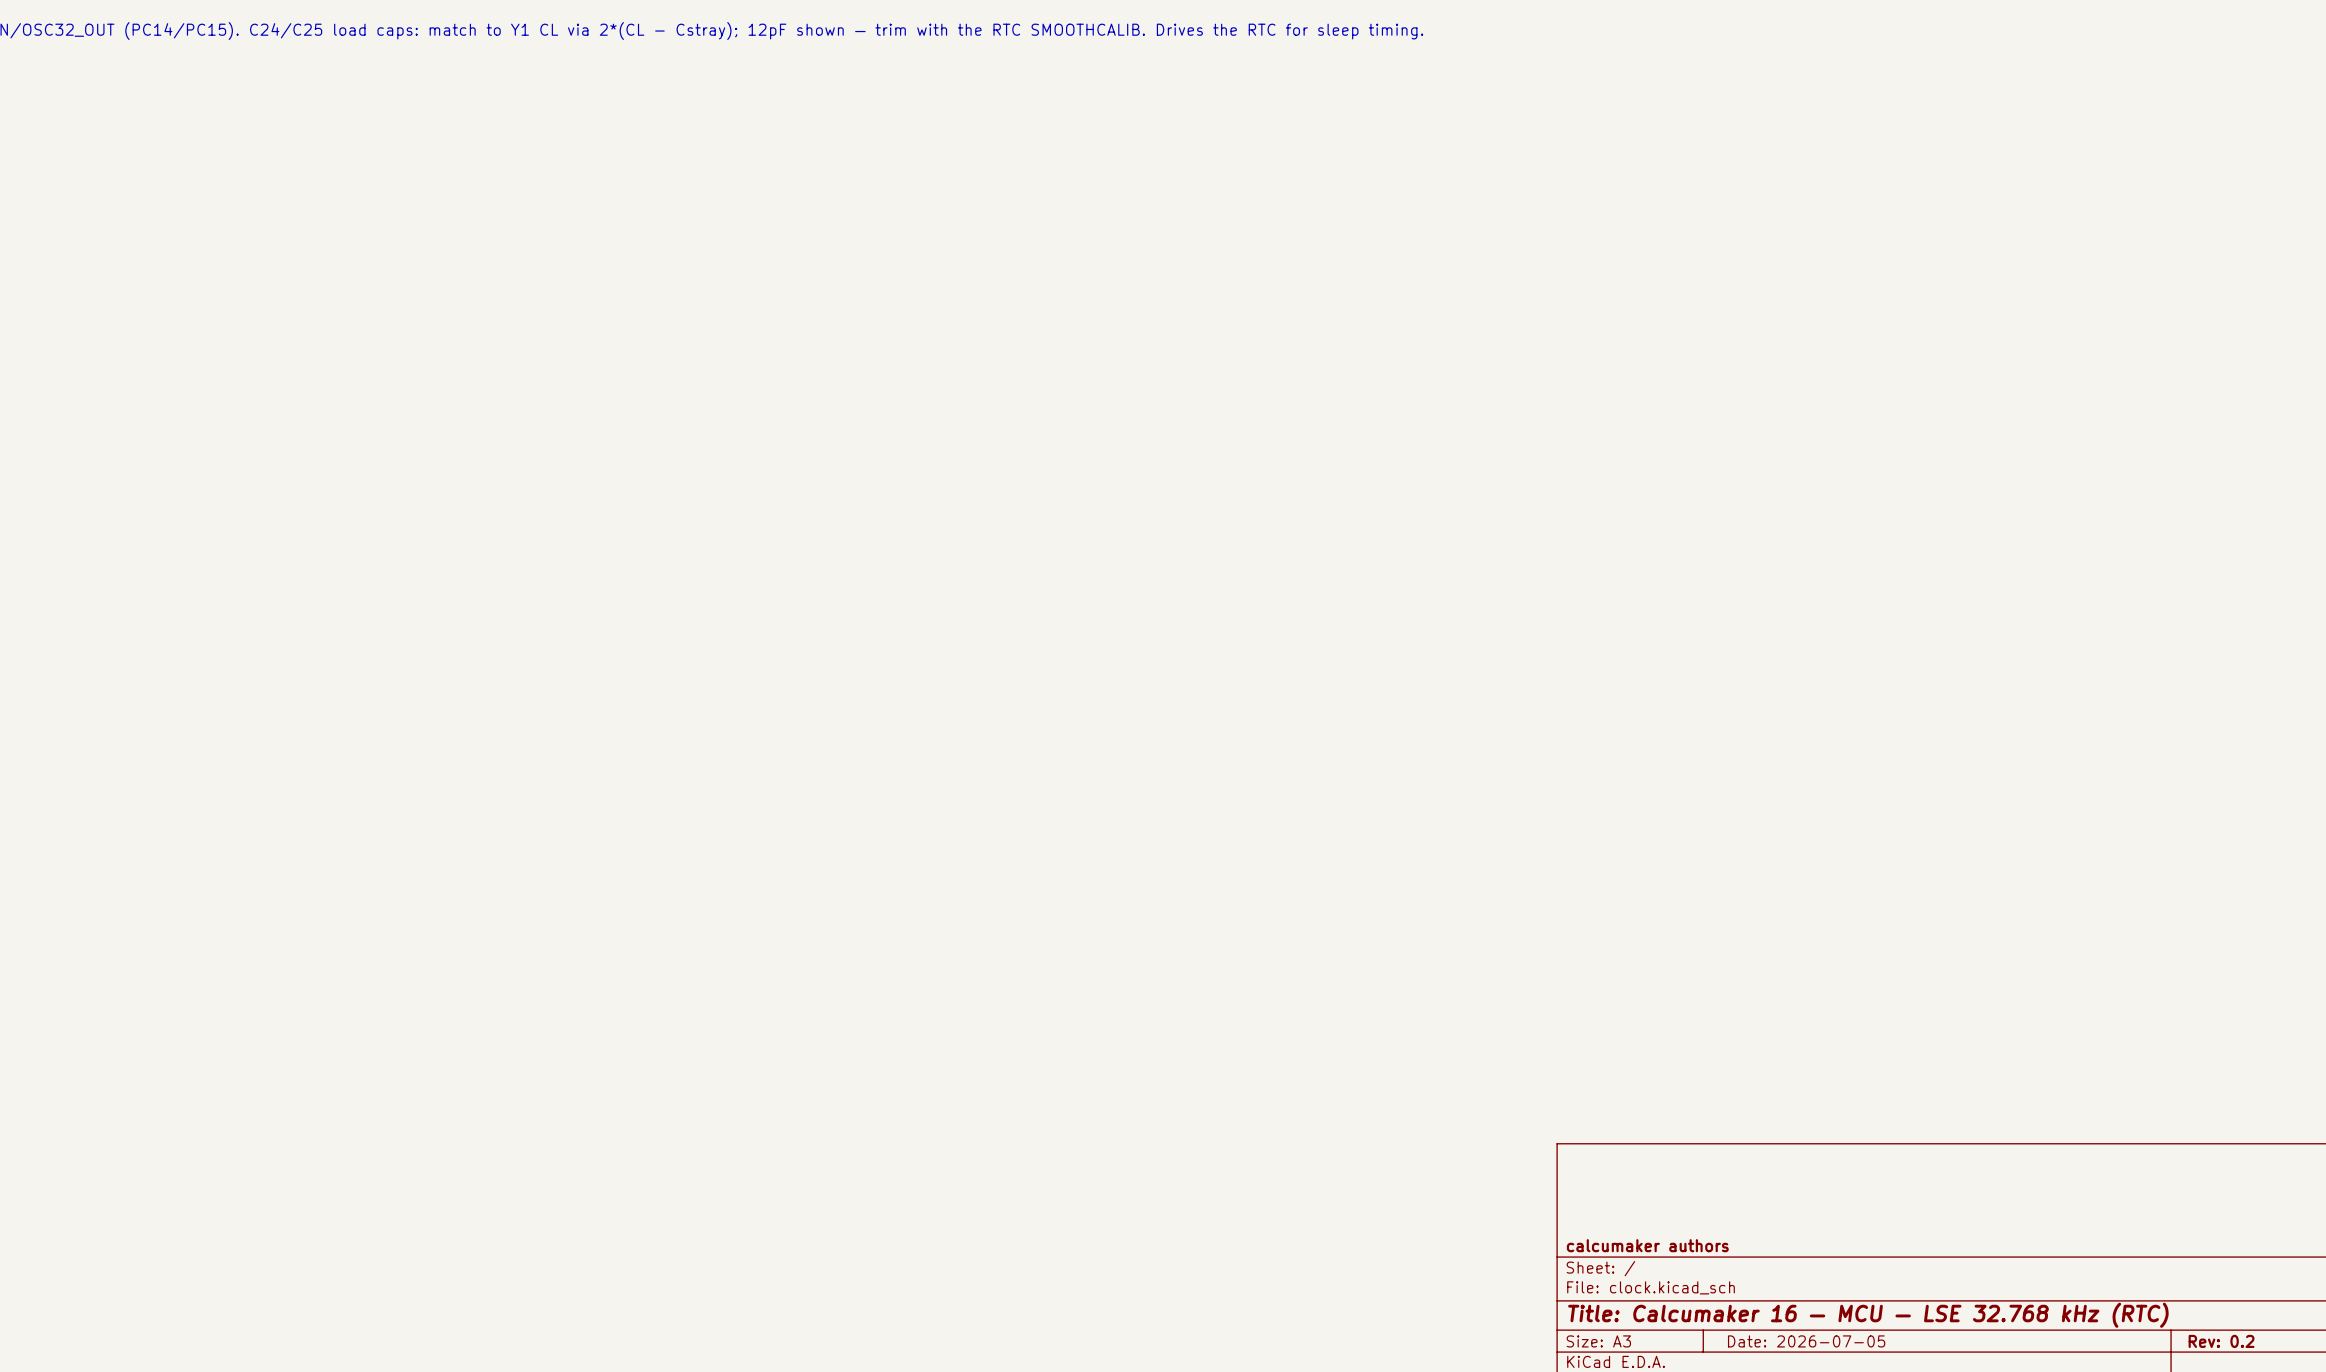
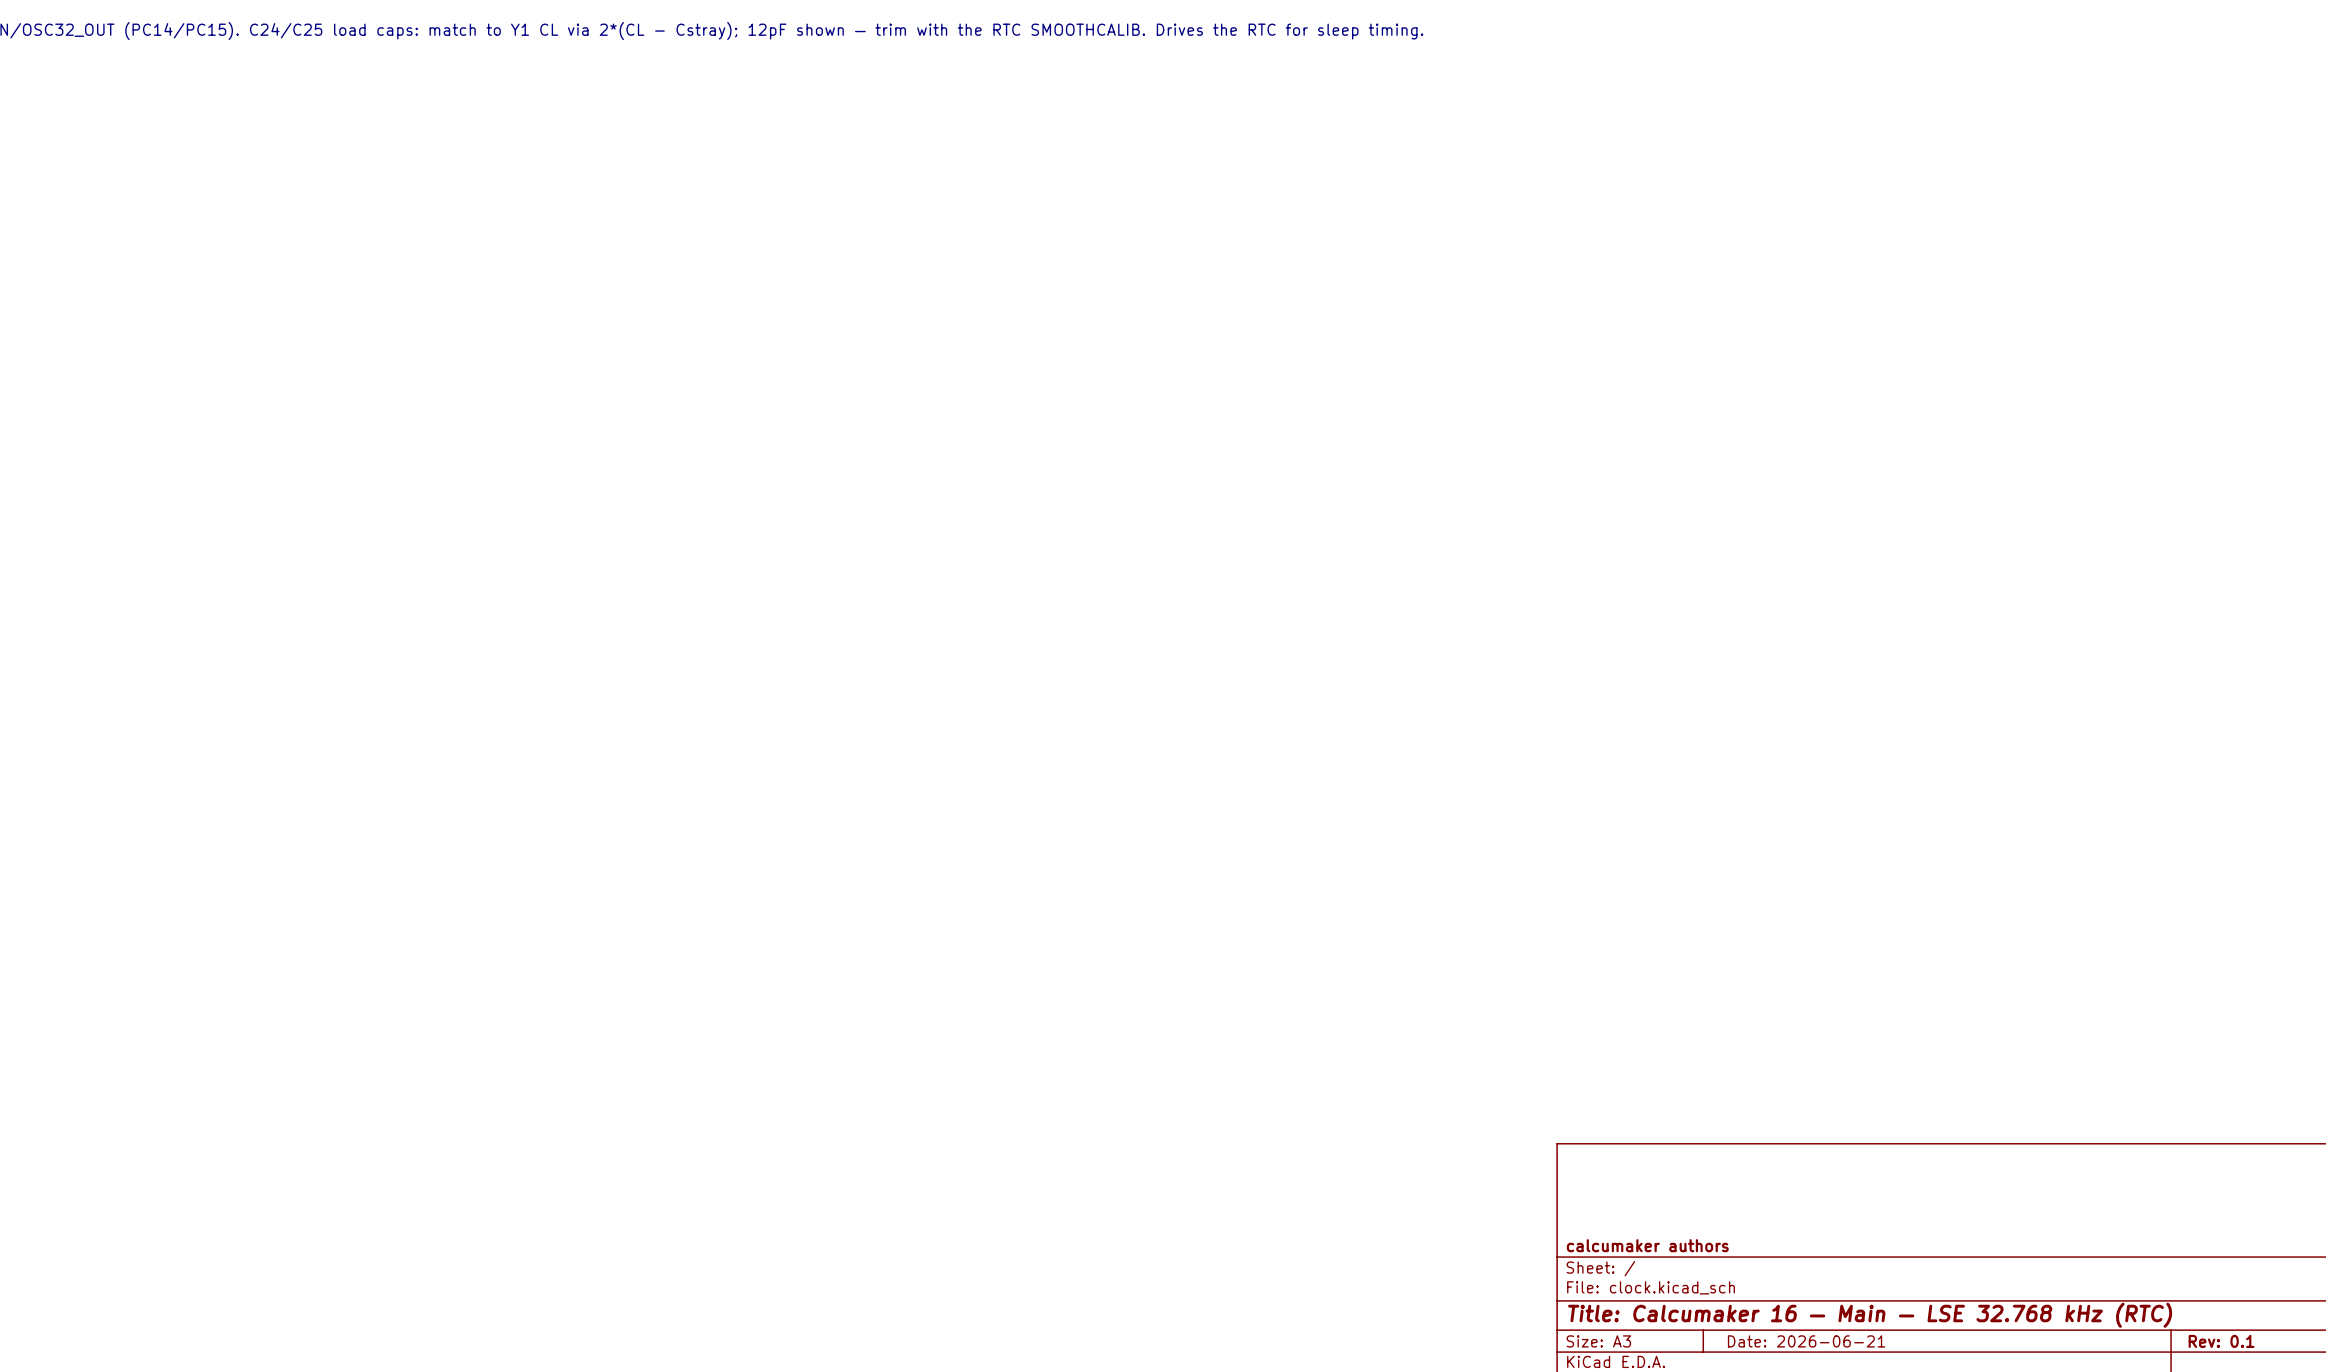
title block: Title: Calcumaker 16 — MCU — LSE 32.768 kHz (RTC) (1868, 1315) -> Title: Calcumaker 16 — Main — LSE 32.768 kHz (RTC) (1870, 1315)
title block: Date: 2026-07-05 (1806, 1341) -> Date: 2026-06-21 (1806, 1341)
title block: Rev: 0.2 (2221, 1341) -> Rev: 0.1 (2221, 1341)

